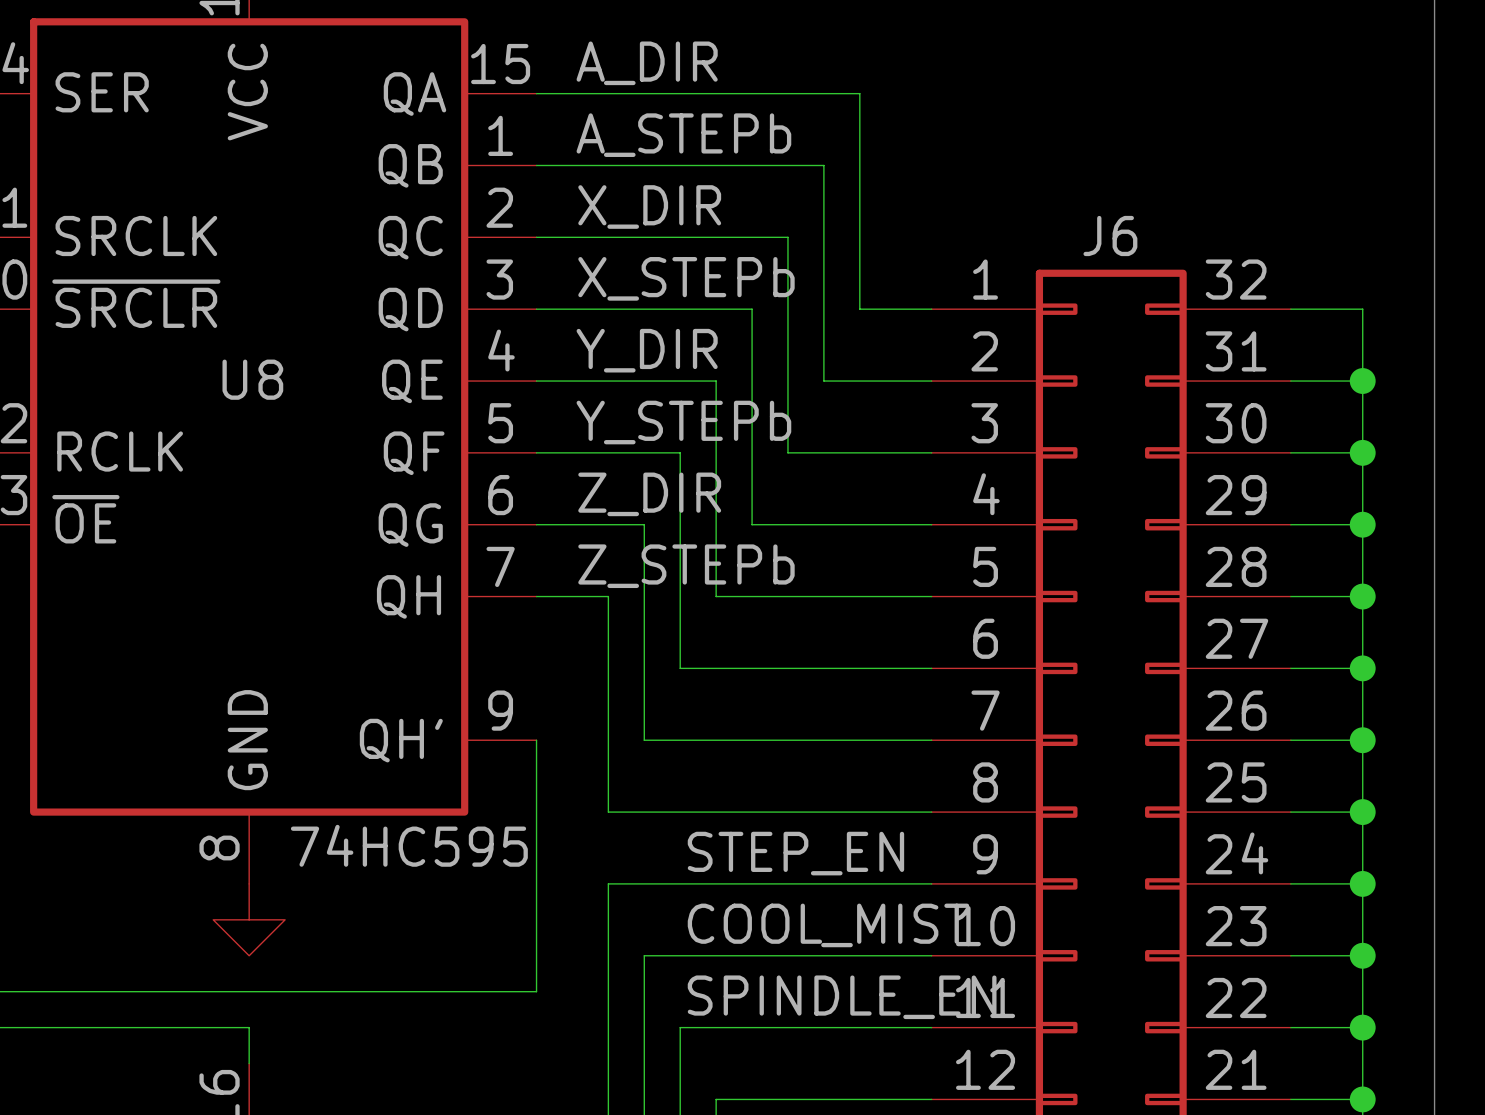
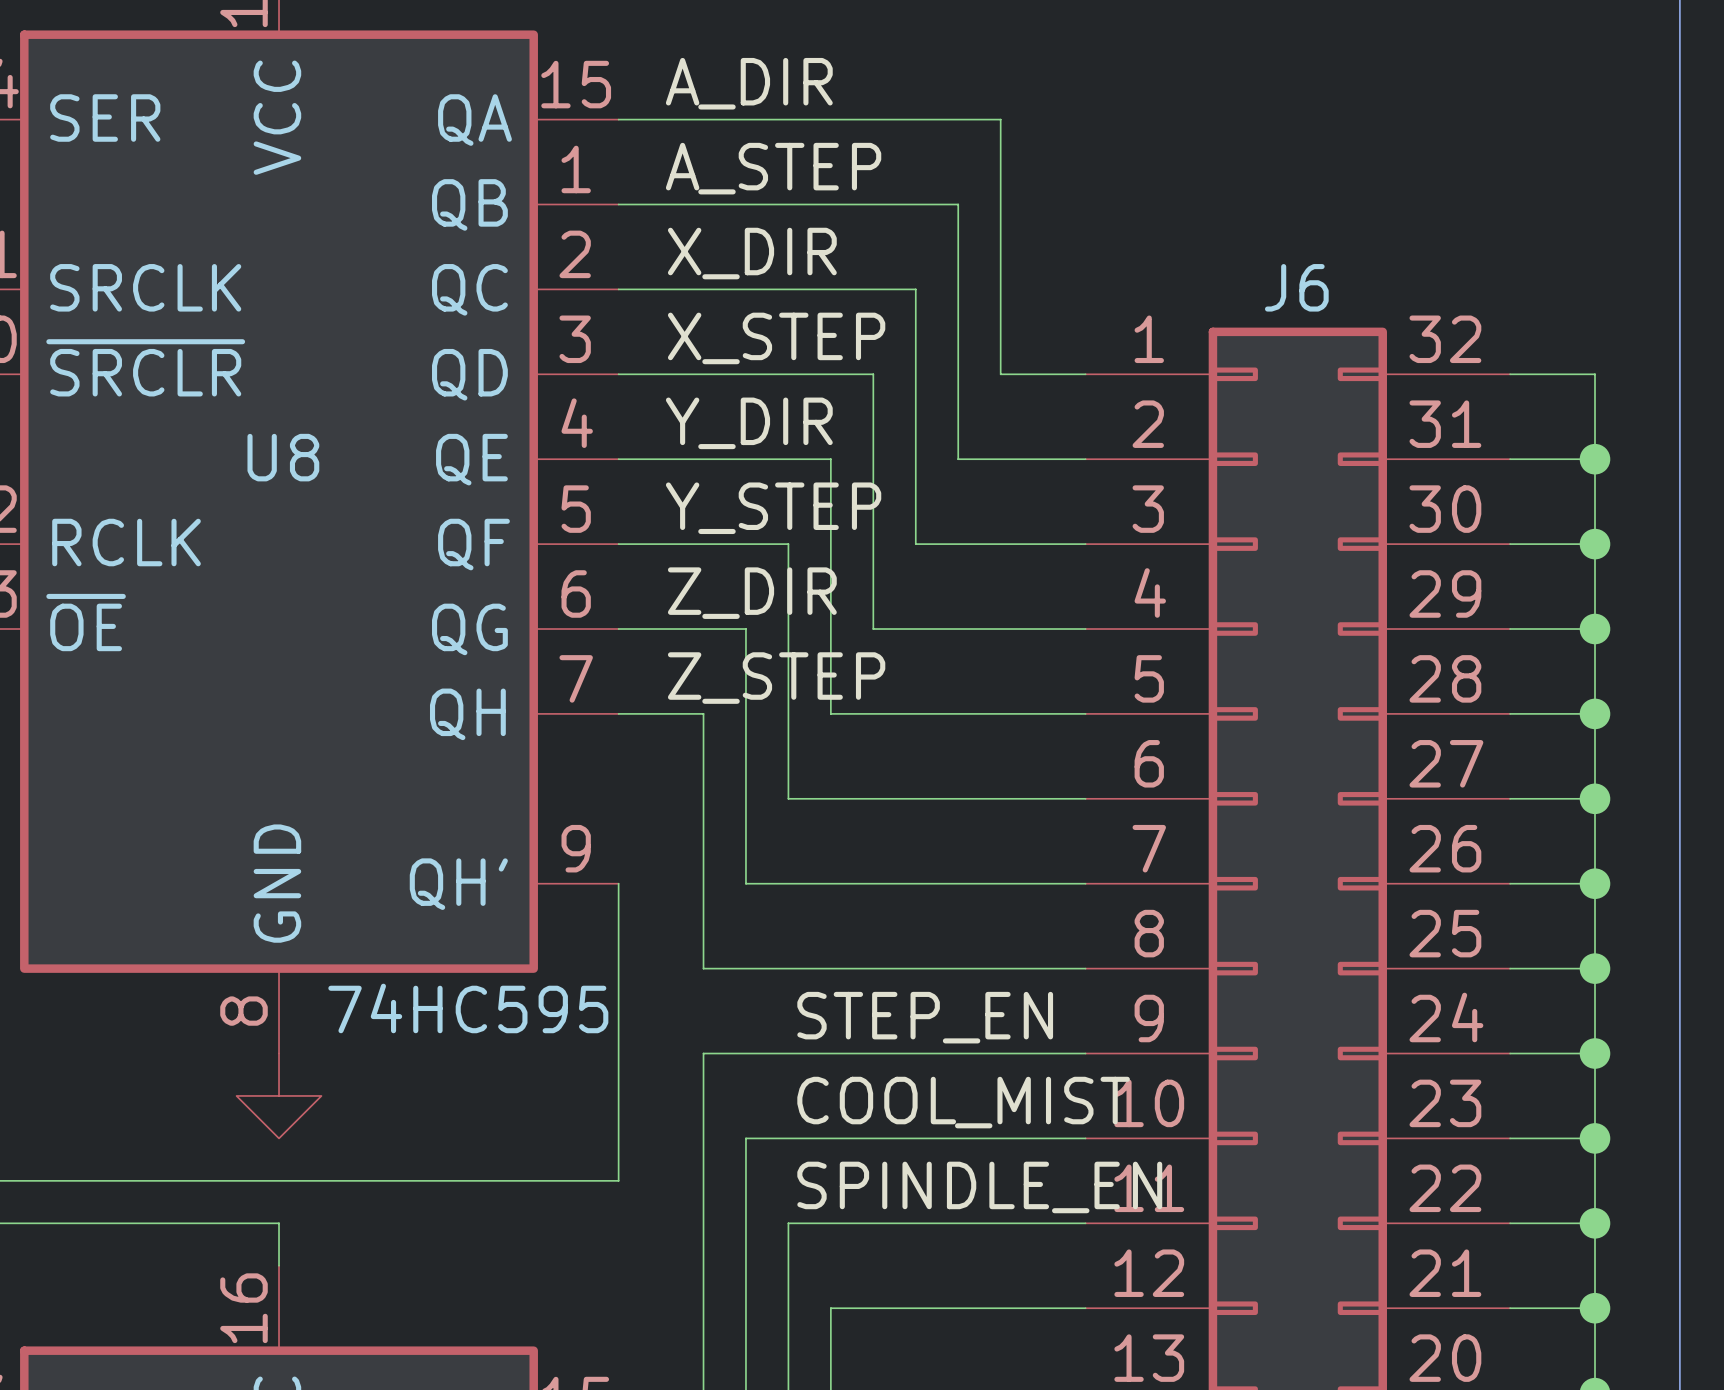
label: A_STEPb (683, 135) -> A_STEP (773, 168)
label: X_STEPb (686, 278) -> X_STEP (776, 338)
label: Y_STEPb (683, 422) -> Y_STEP (773, 508)
label: Z_STEPb (686, 566) -> Z_STEP (776, 678)

